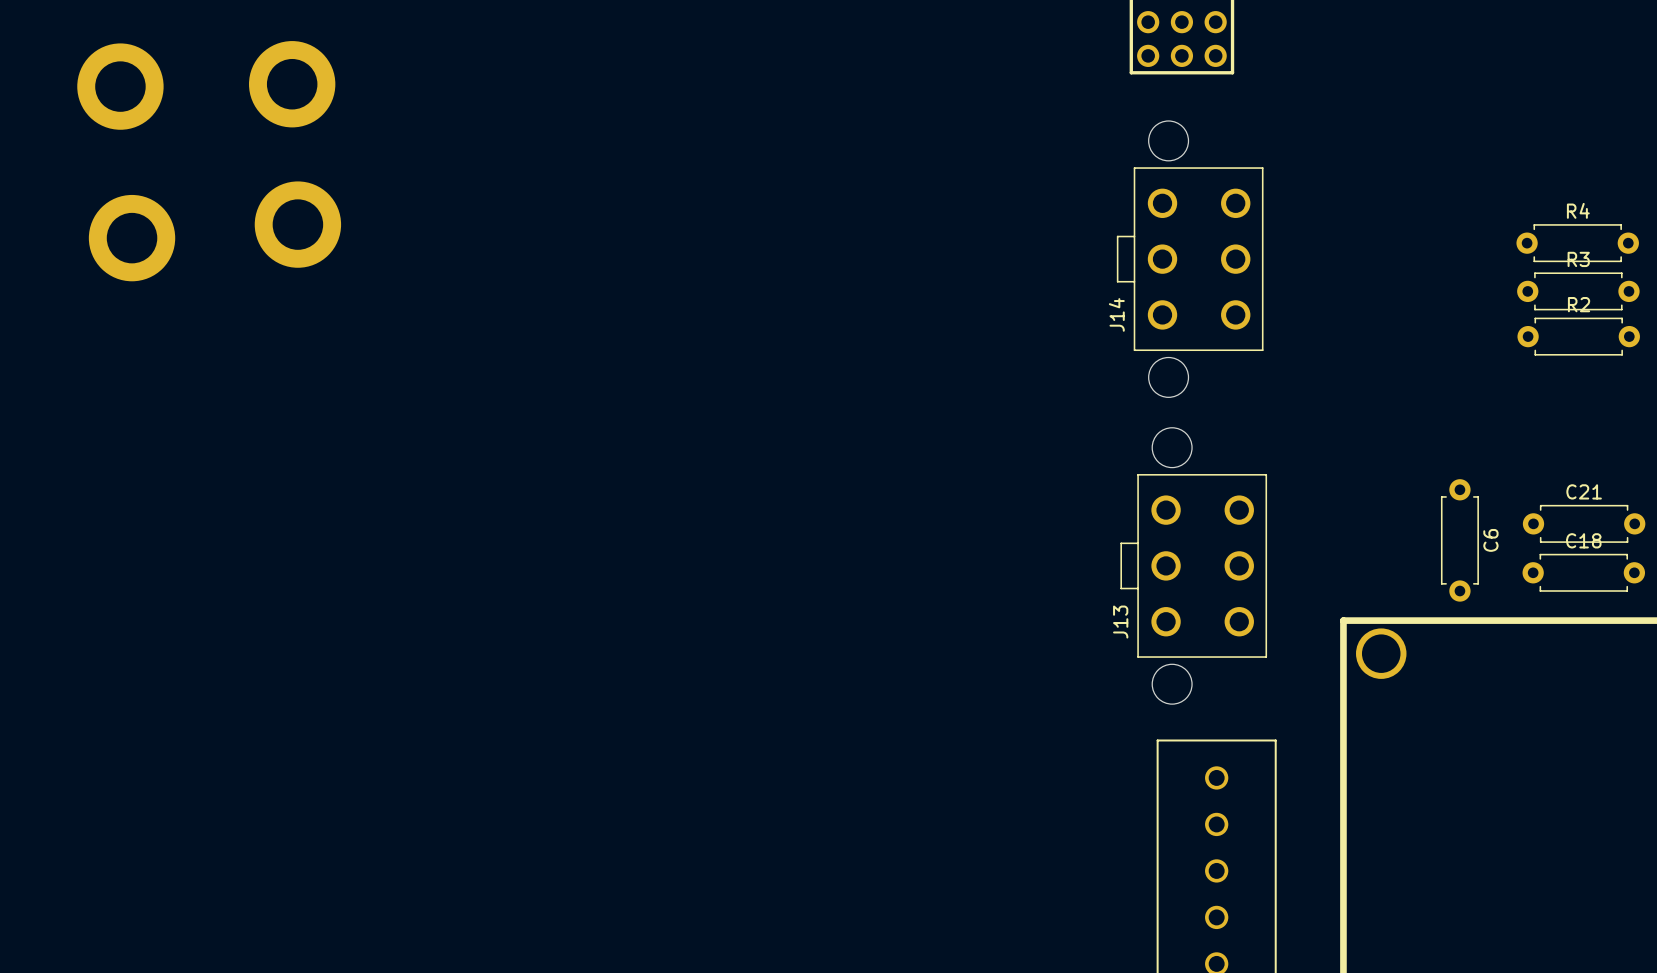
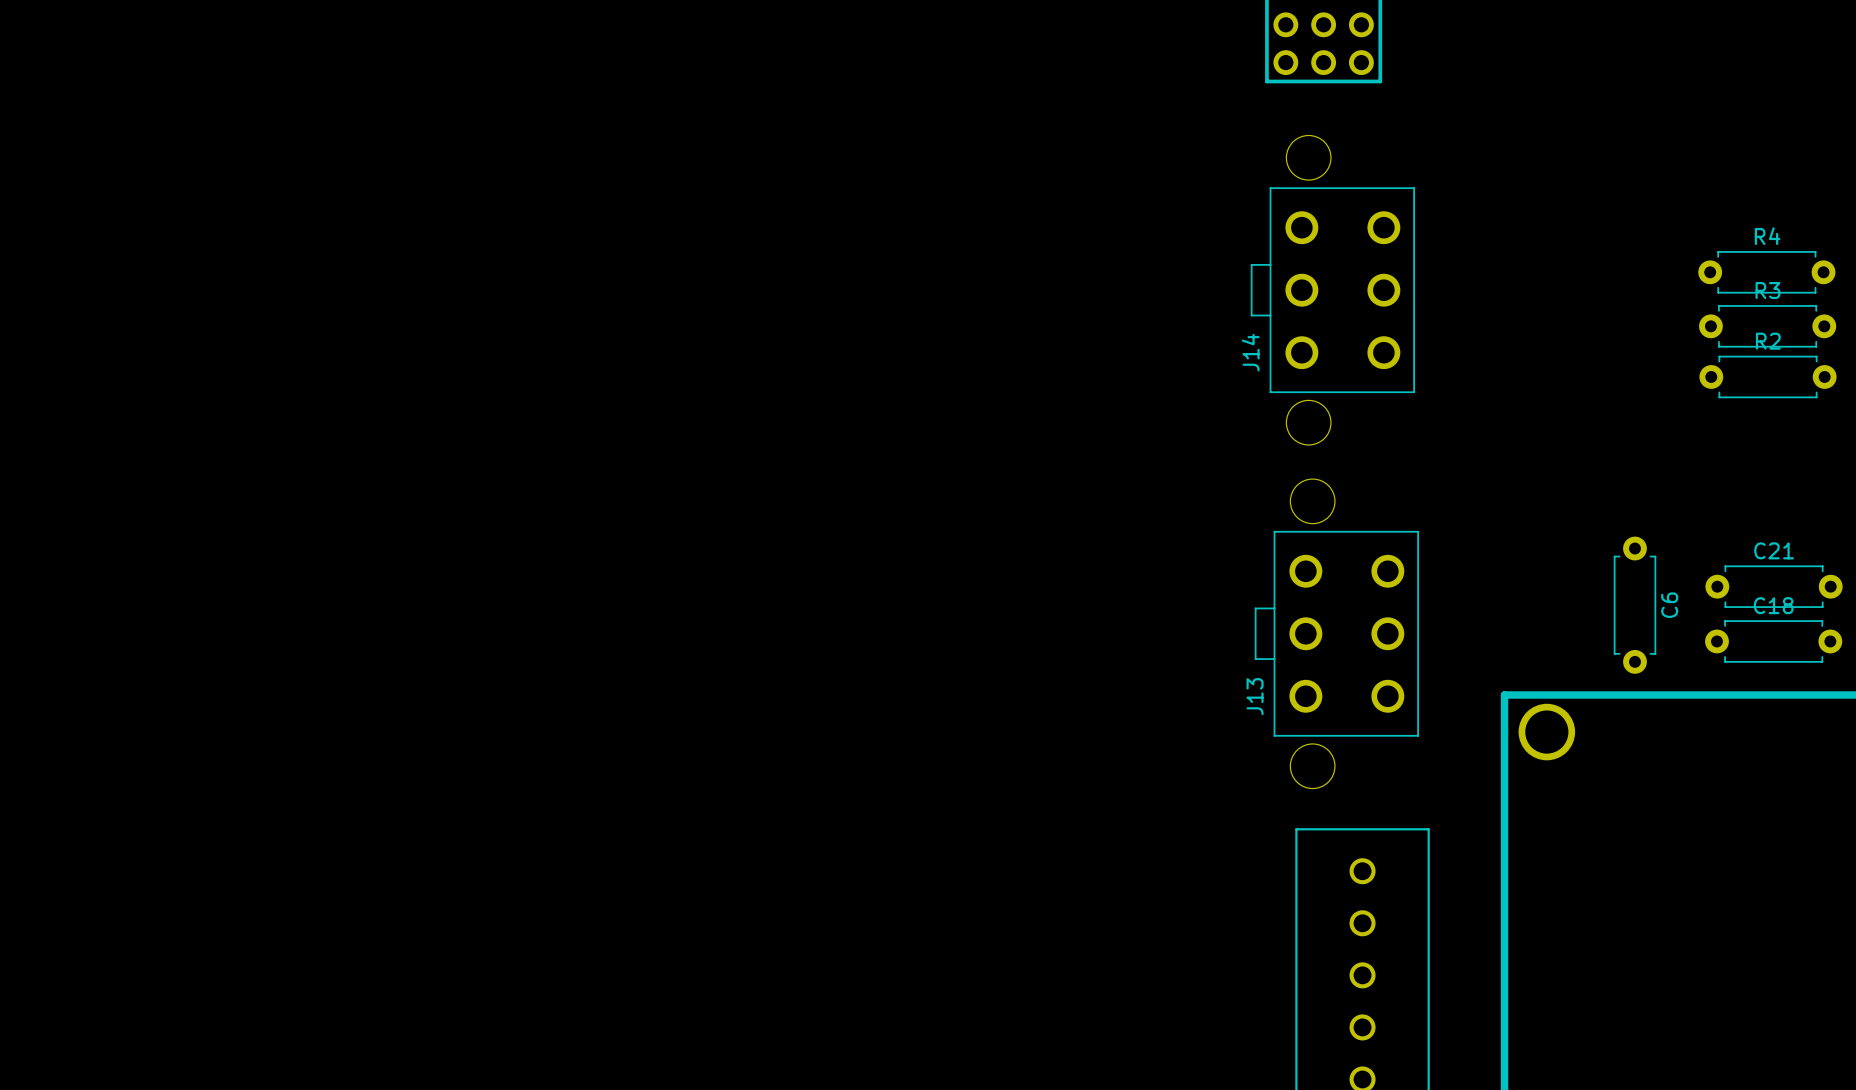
part: (292, 84) -> none
part: (120, 86) -> none
part: (297, 224) -> none
part: (132, 238) -> none

